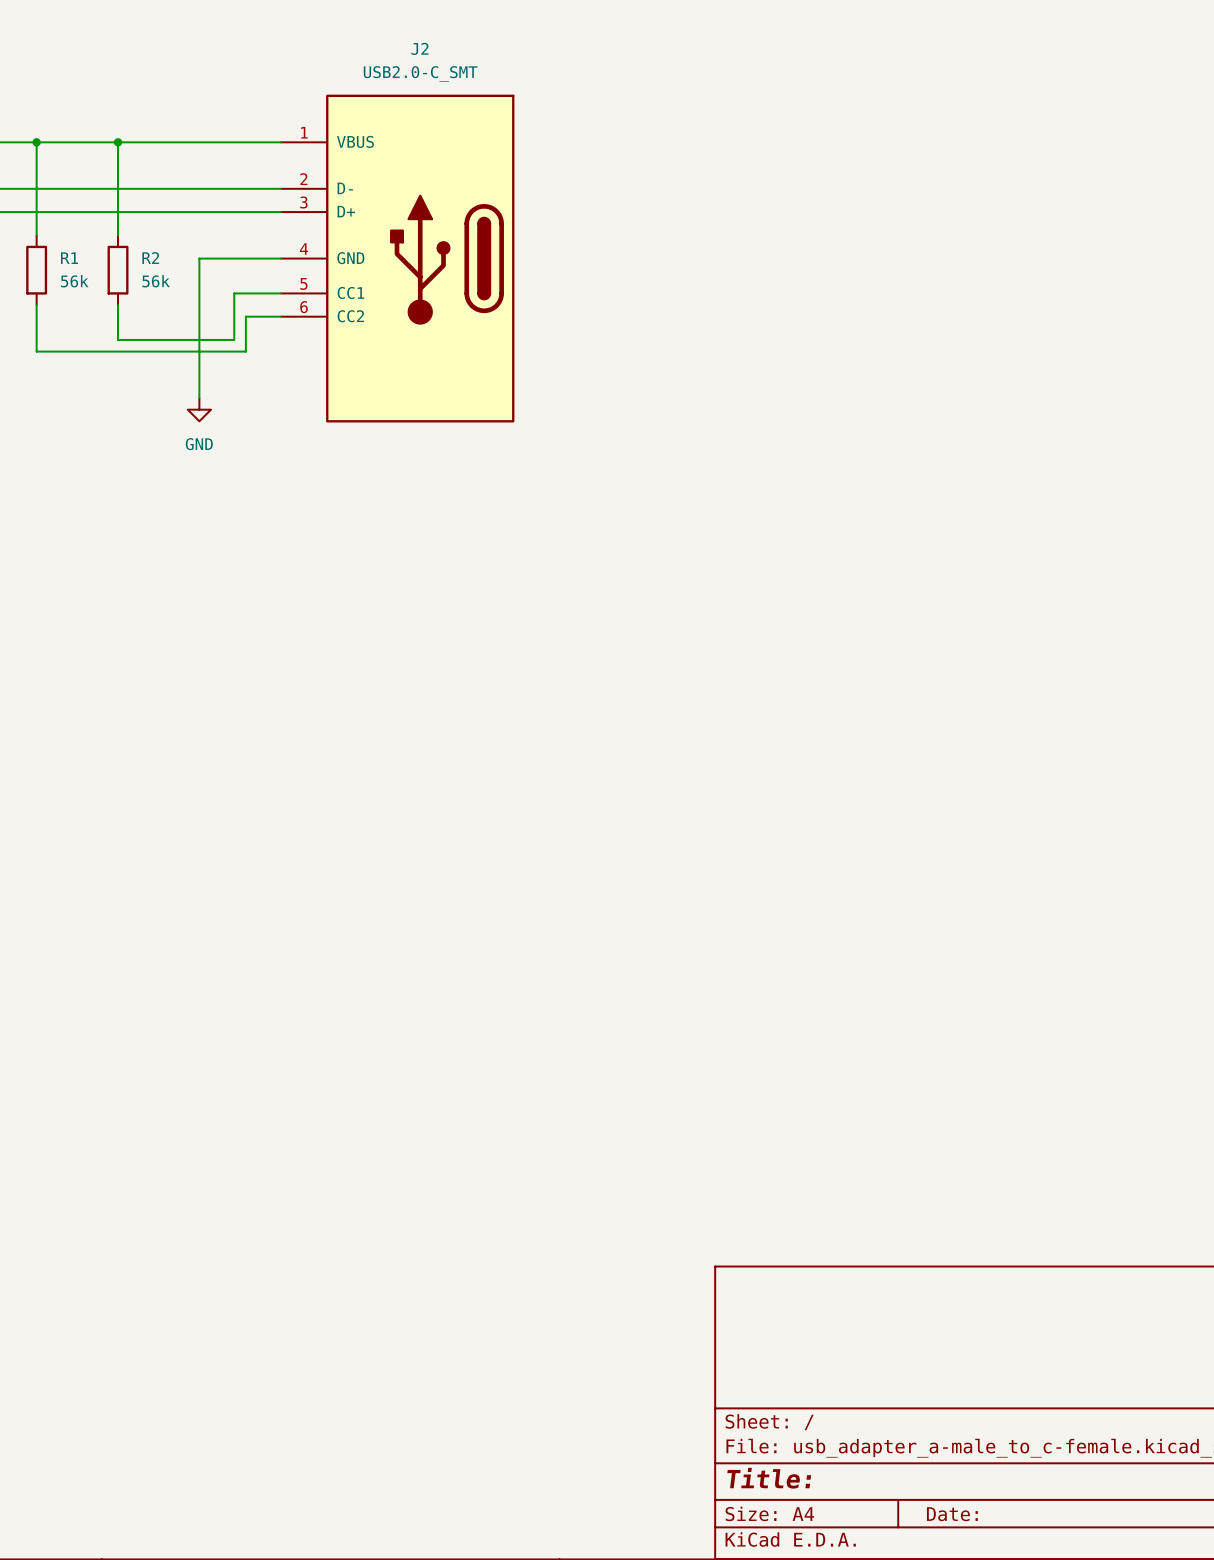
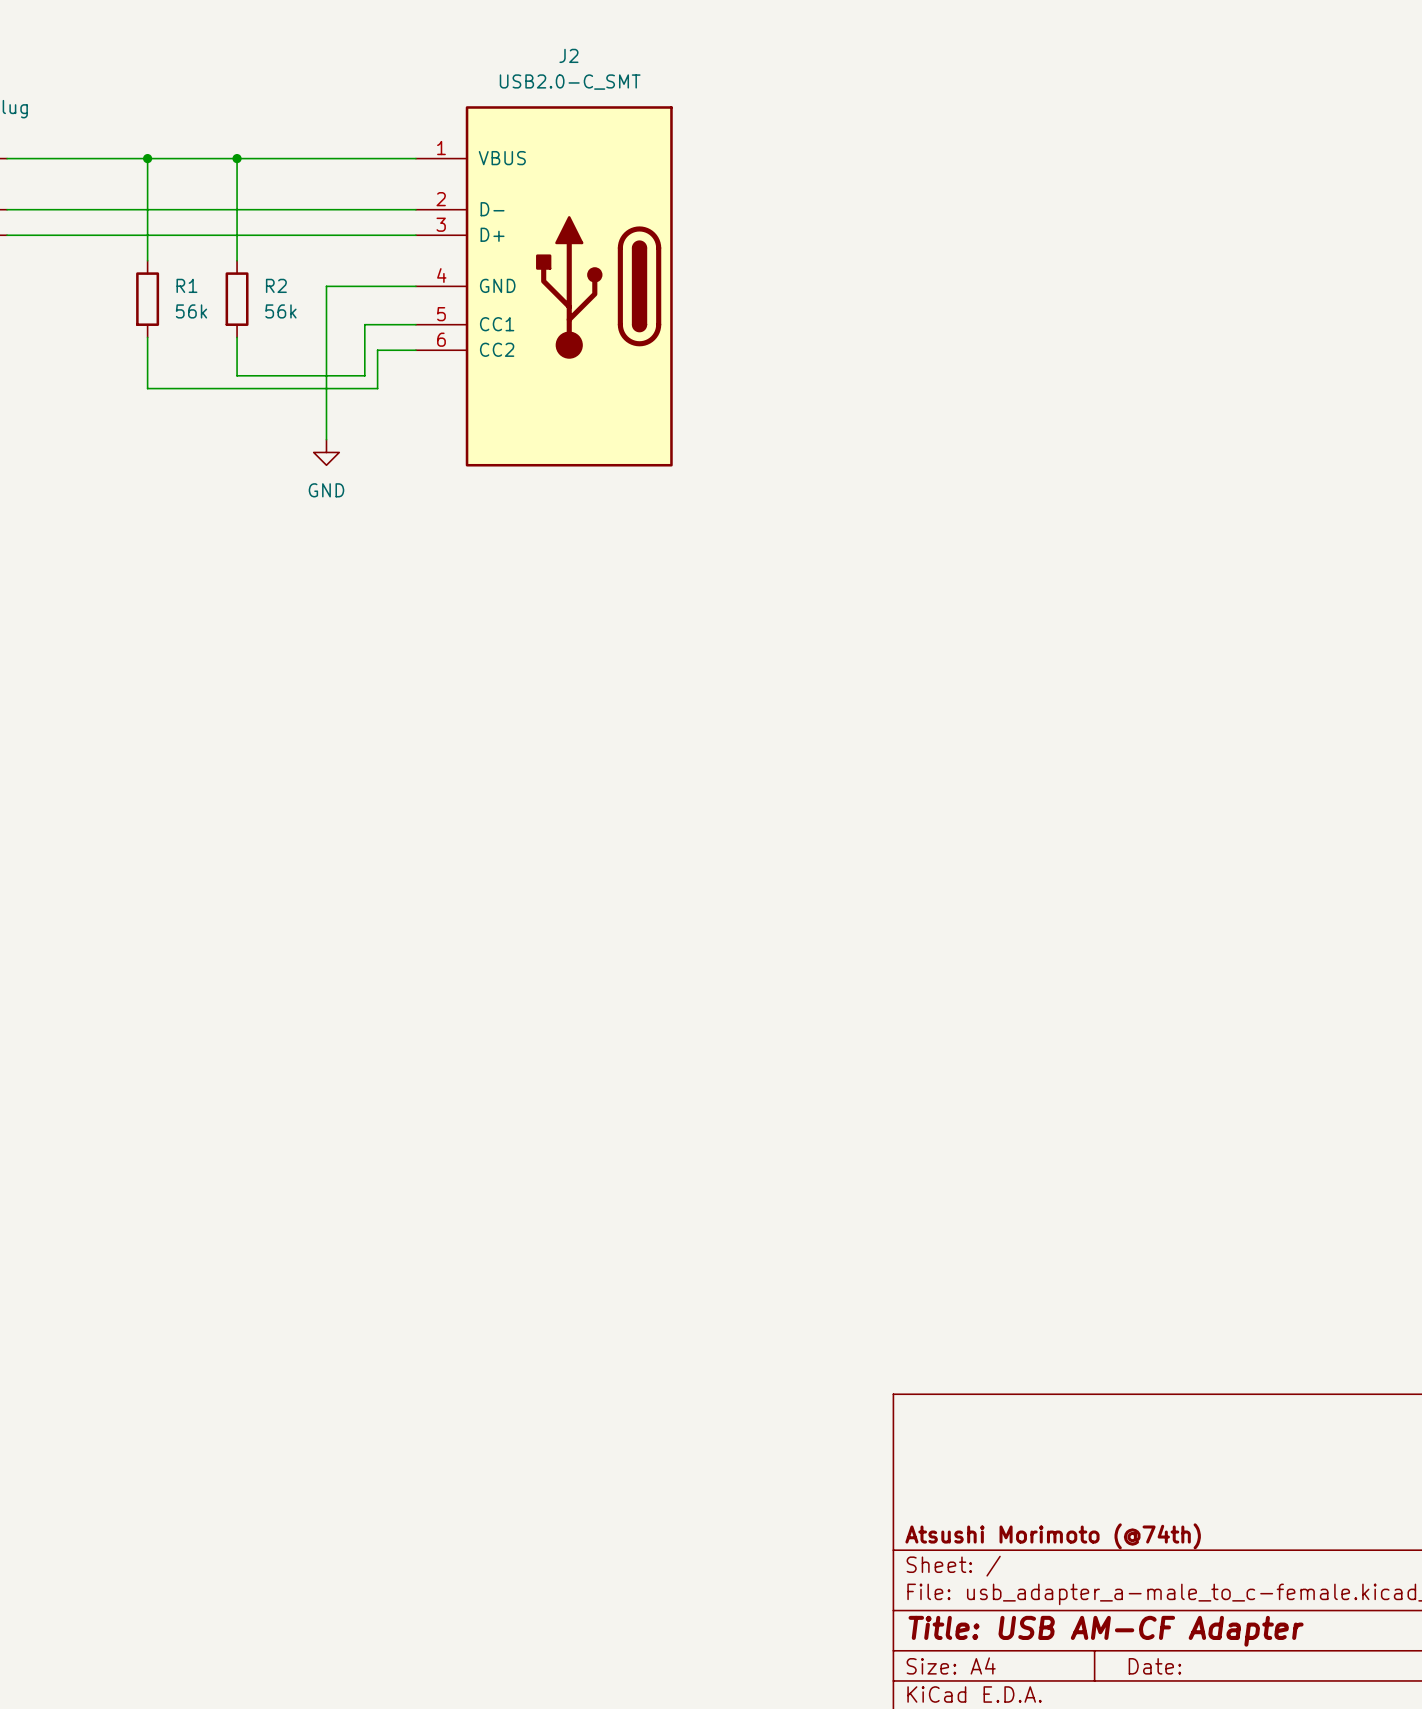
title block: none -> Atsushi Morimoto (@74th) (1053, 1536)
title block: Title: (769, 1478) -> Title: USB AM-CF Adapter (1106, 1631)

